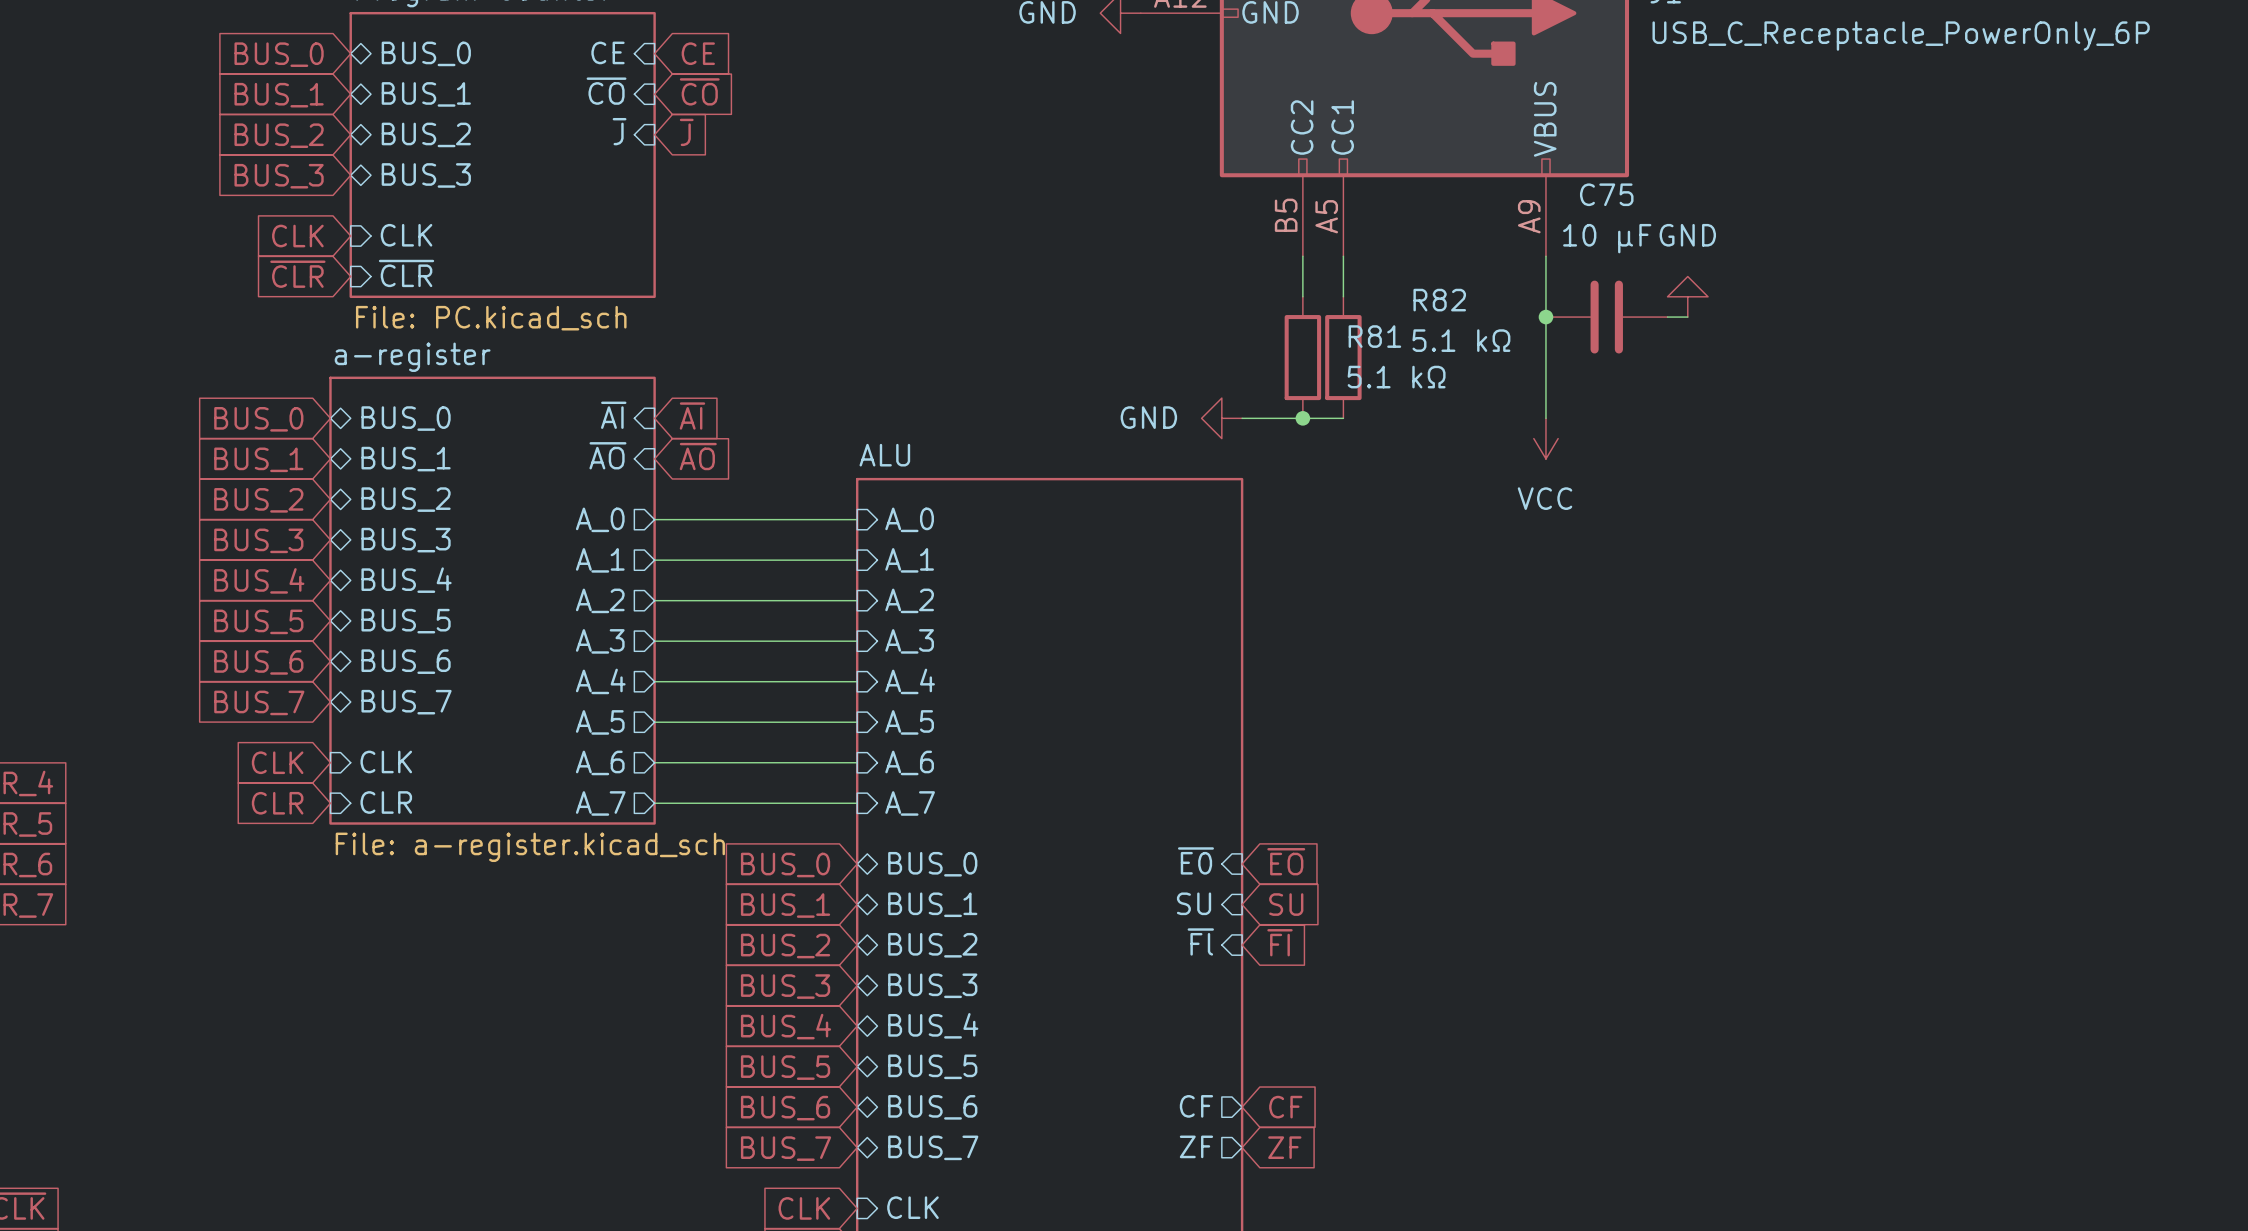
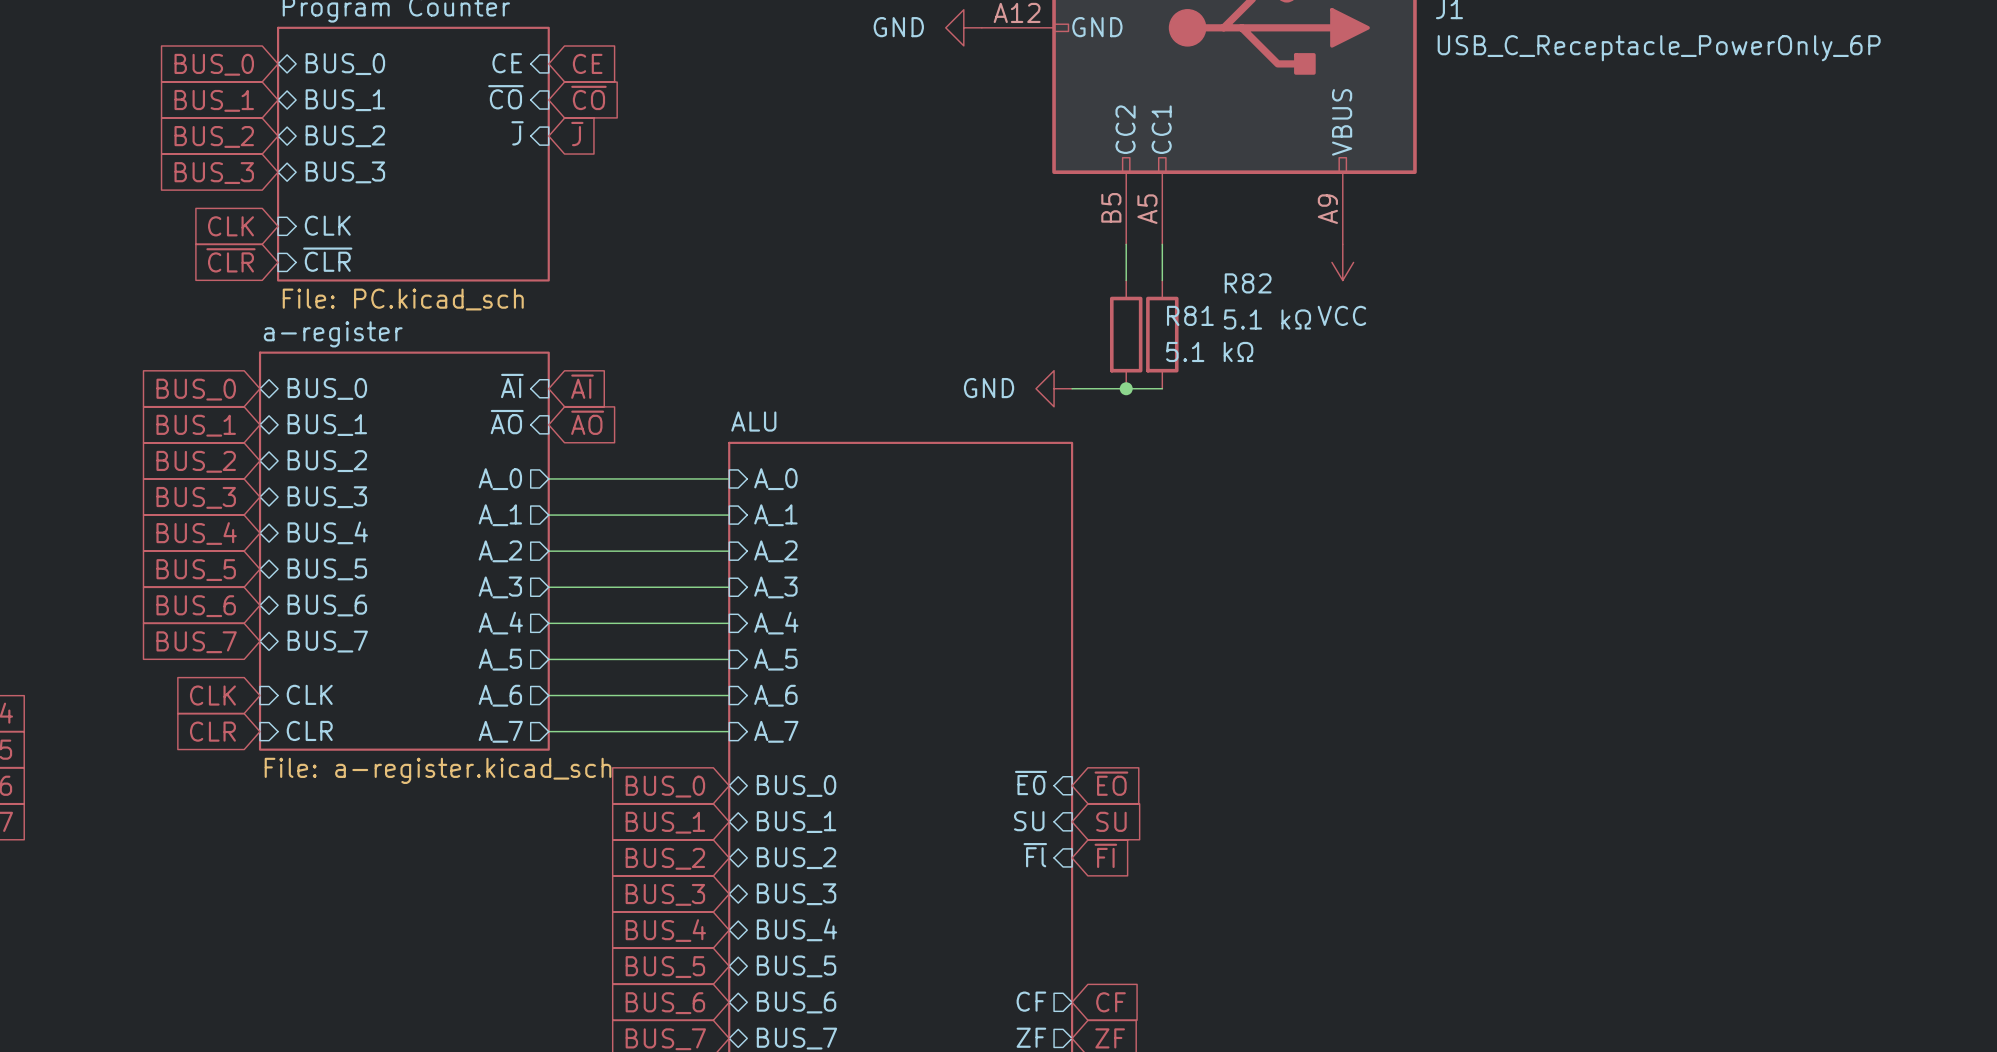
wire: (1545, 256) (1545, 418) -> none
power symbol: GND (1687, 296) -> none
junction: (1545, 317) -> none
C75: 10 µF (1606, 317) -> none
wire: (1667, 317) (1687, 317) -> none
power symbol position: VCC (1545, 438) -> VCC (1342, 262)

